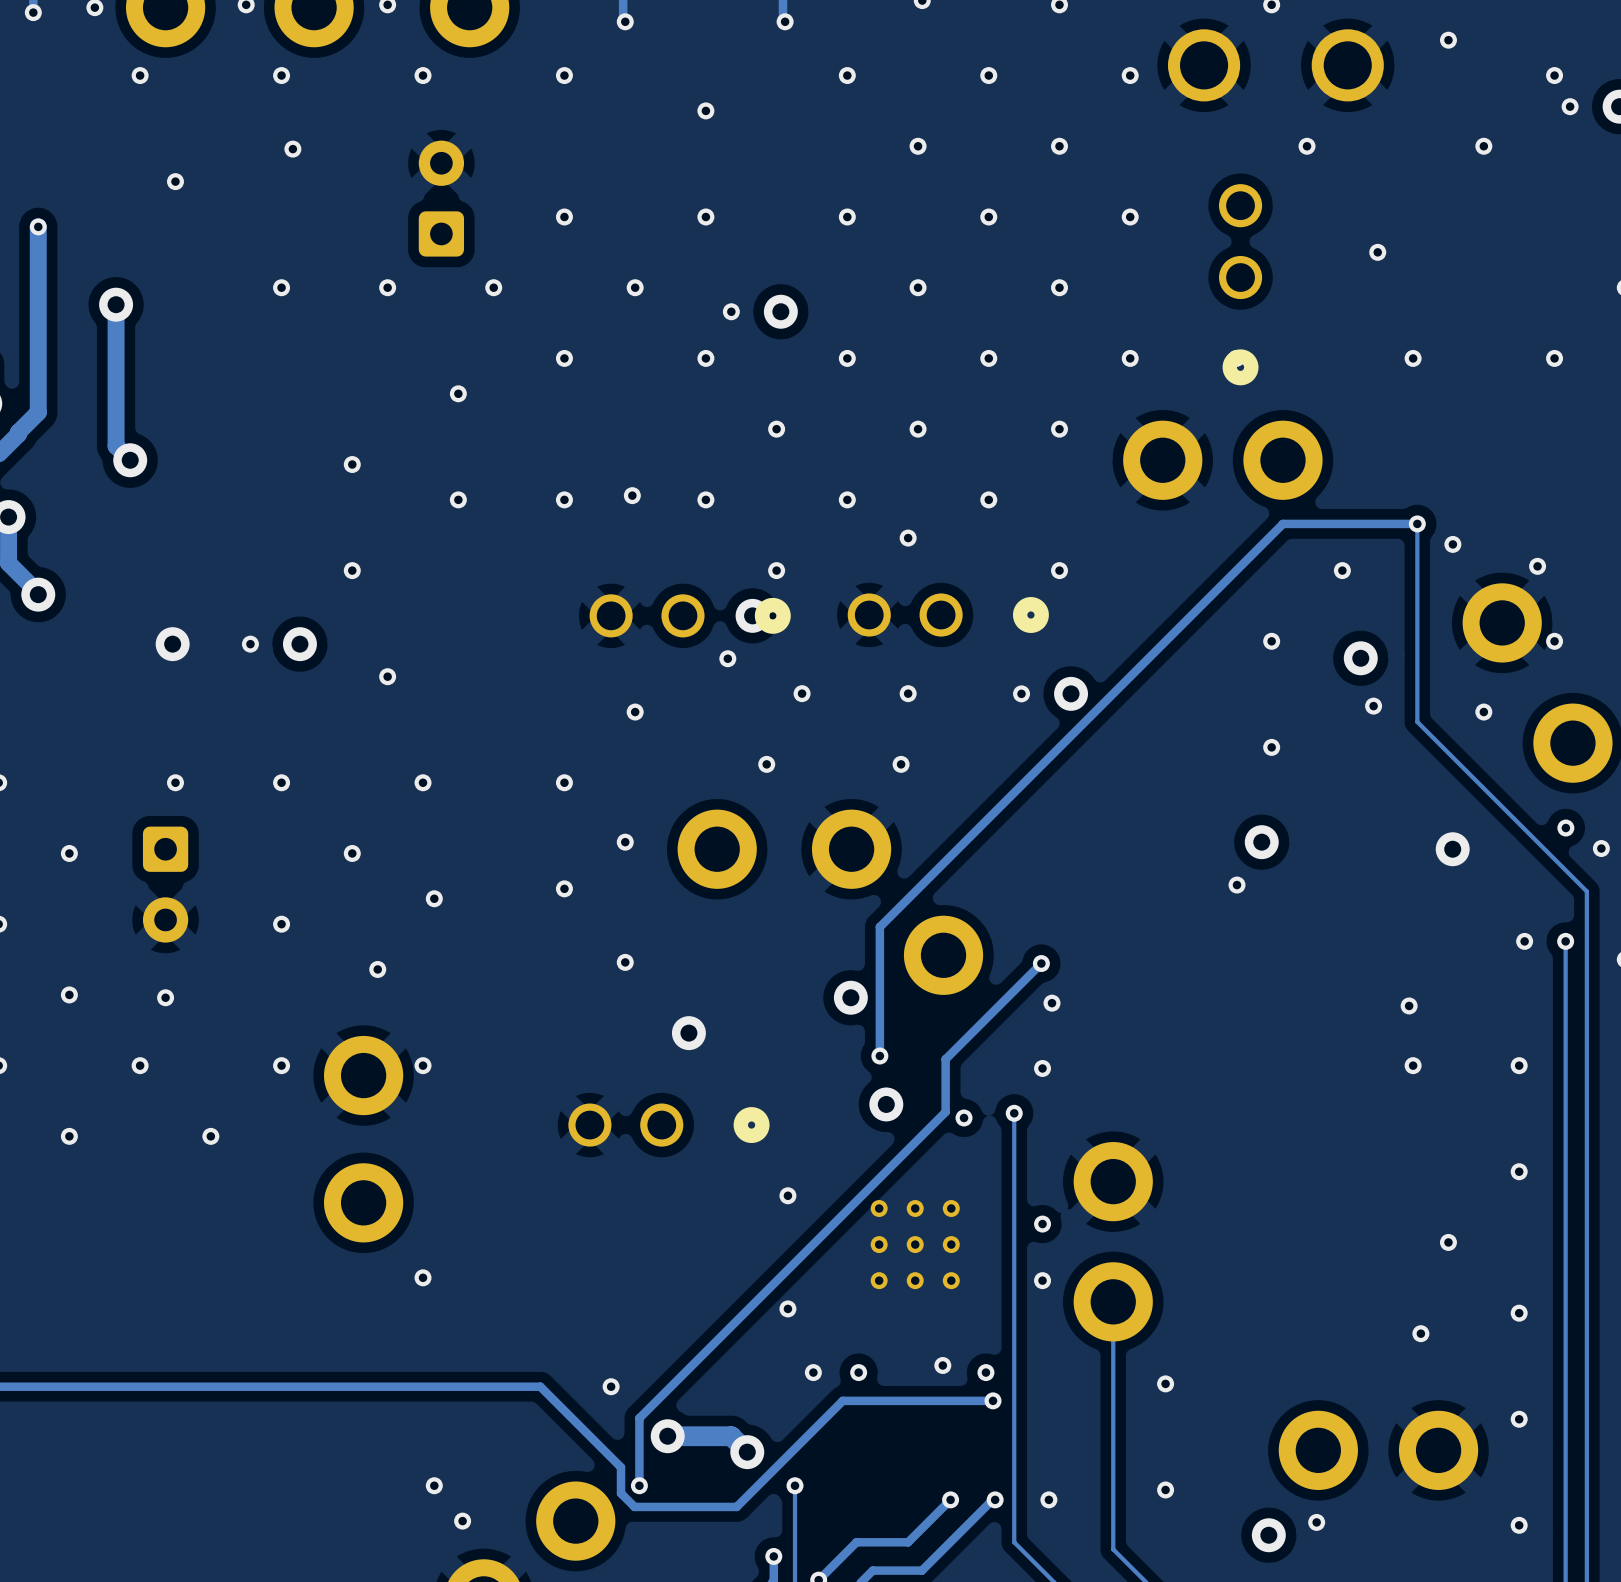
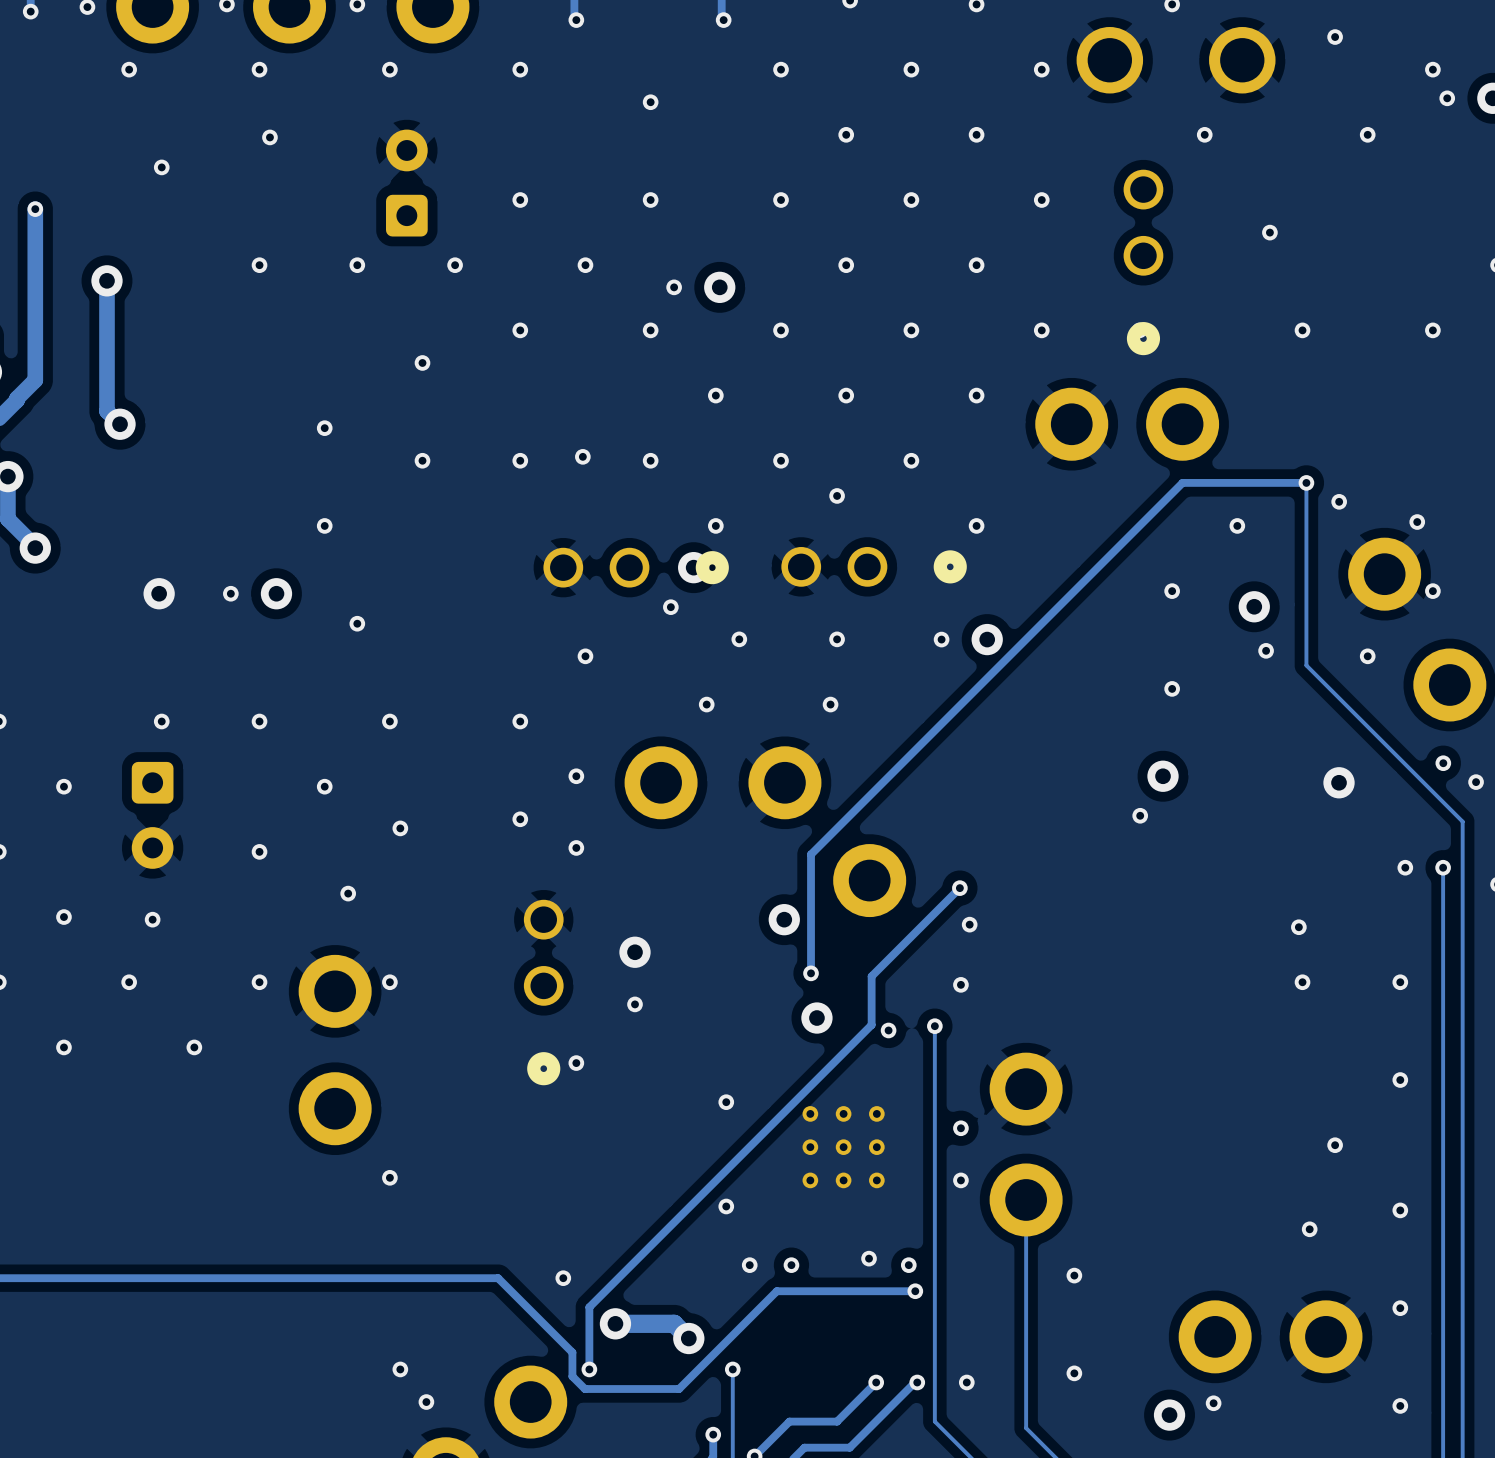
via position: (625, 962) -> (576, 847)
via: none -> (635, 1004)
part rotation: 0° (668, 1125) -> 90° clockwise (543, 992)
via: none -> (576, 1063)

